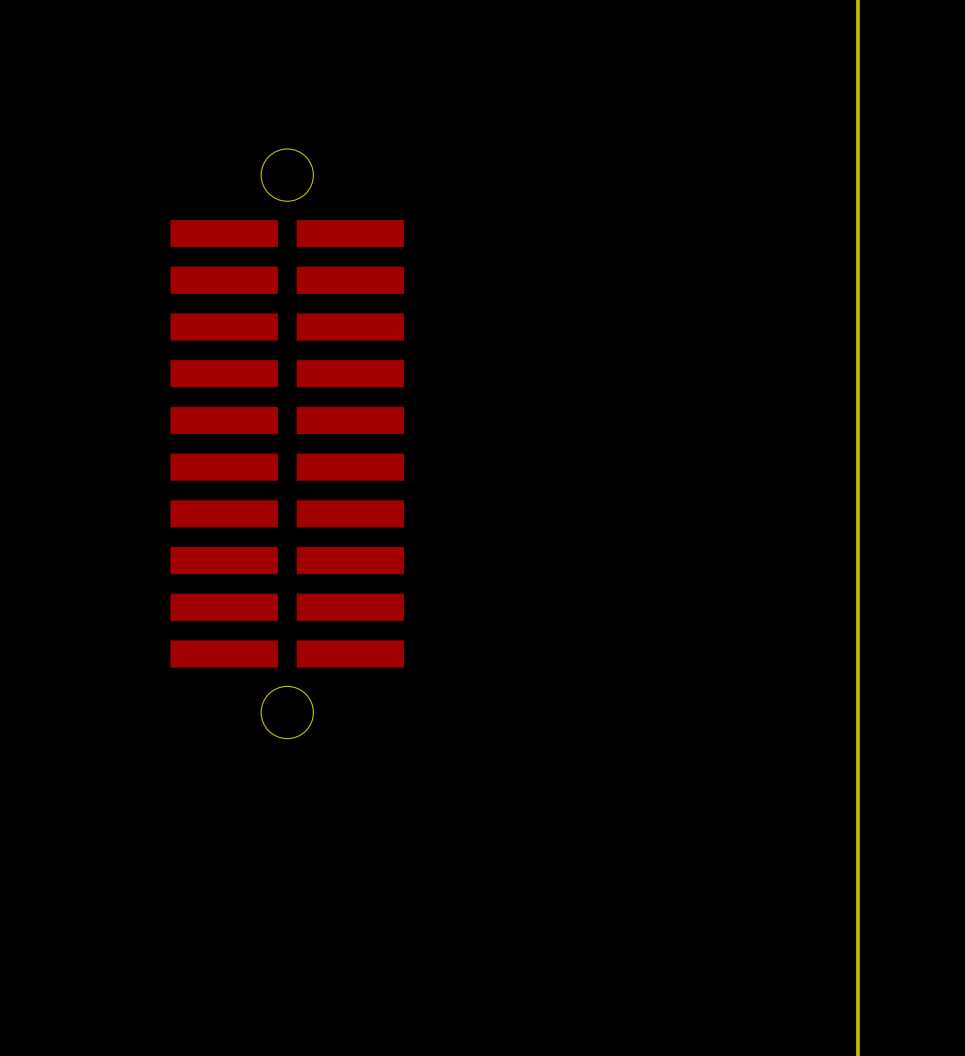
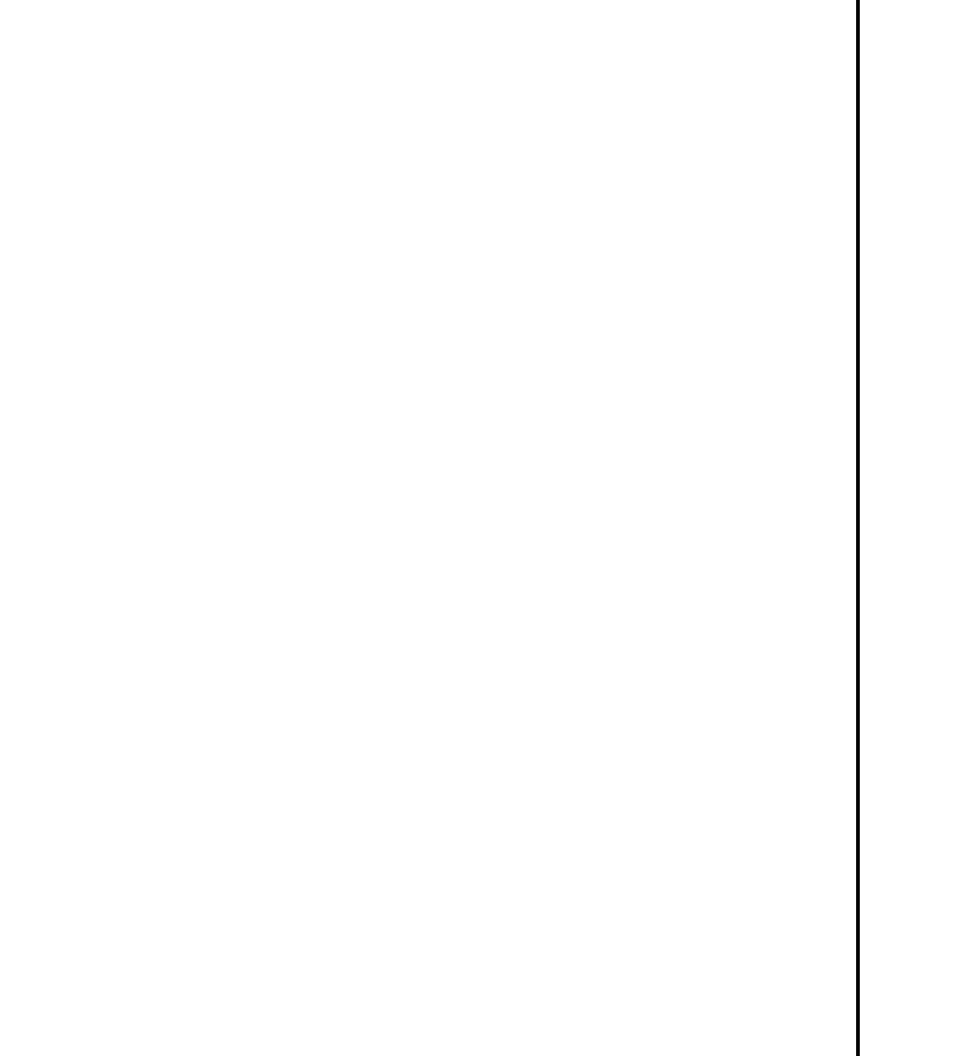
part: (287, 443) -> none

